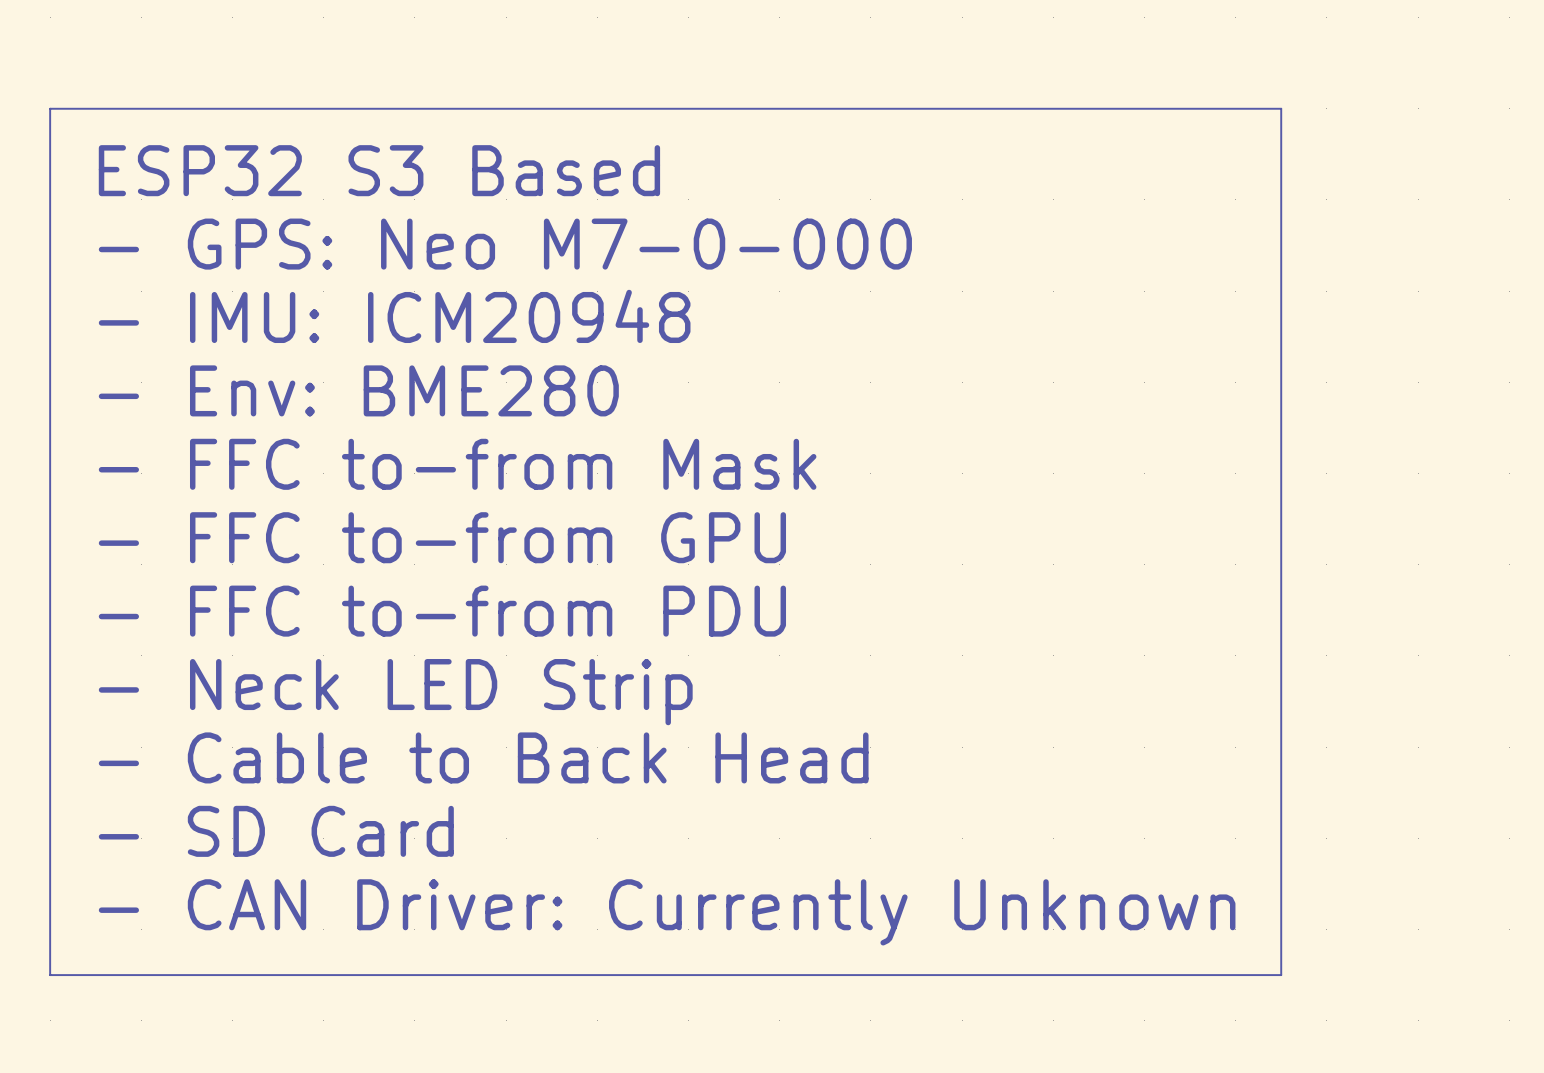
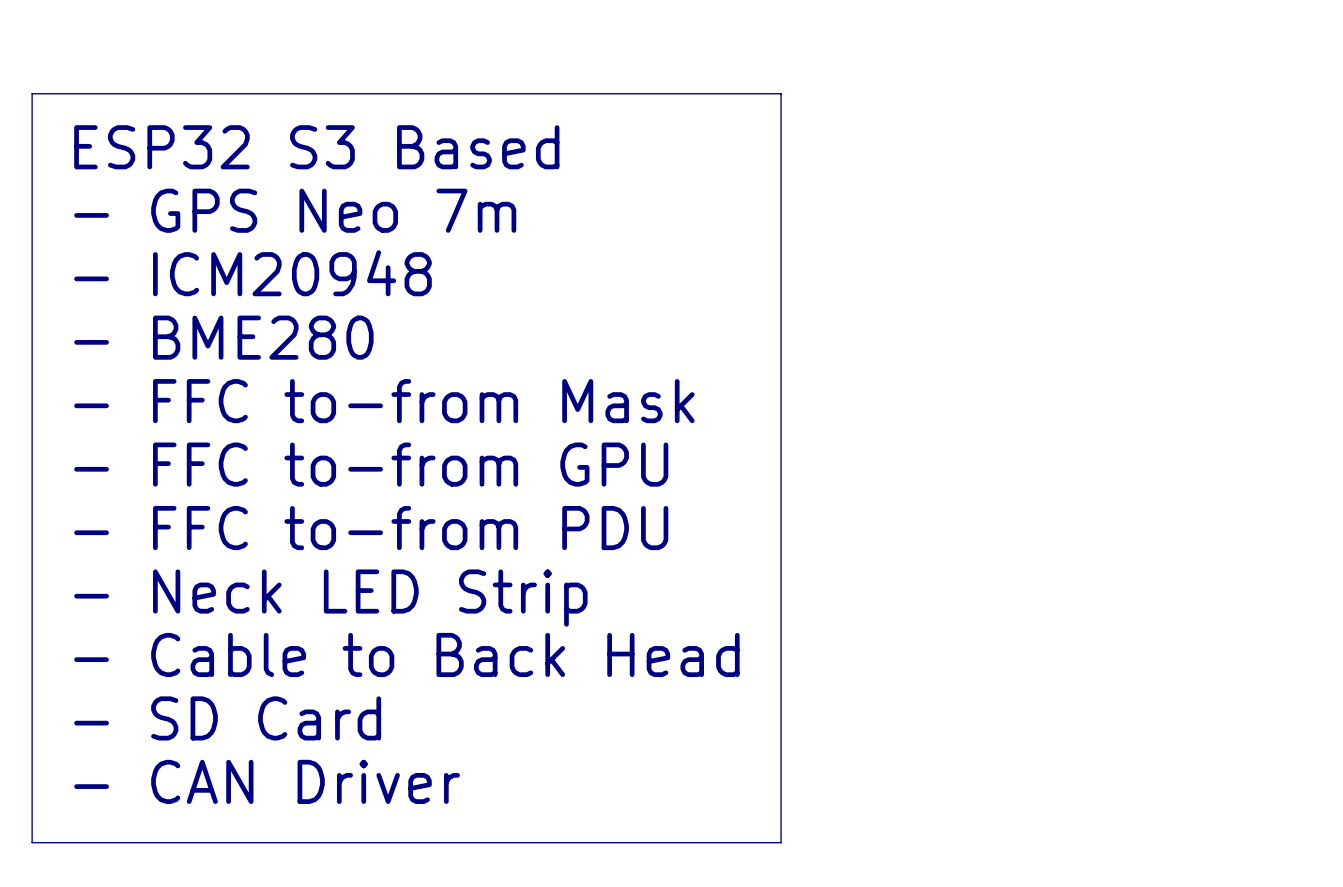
line: (916, 108) (1281, 108) (1281, 975) (916, 975) -> (781, 93) (781, 842)
text: - GPS: Neo M7-0-000 (505, 244) -> - GPS Neo 7m (295, 210)
text: - IMU: ICM20948 (394, 316) -> - ICM20948 (252, 273)
text: - Env: BME280 (358, 390) -> - BME280 (223, 337)
text: - CAN Driver: Currently Unknown (667, 912) -> - CAN Driver (267, 781)

